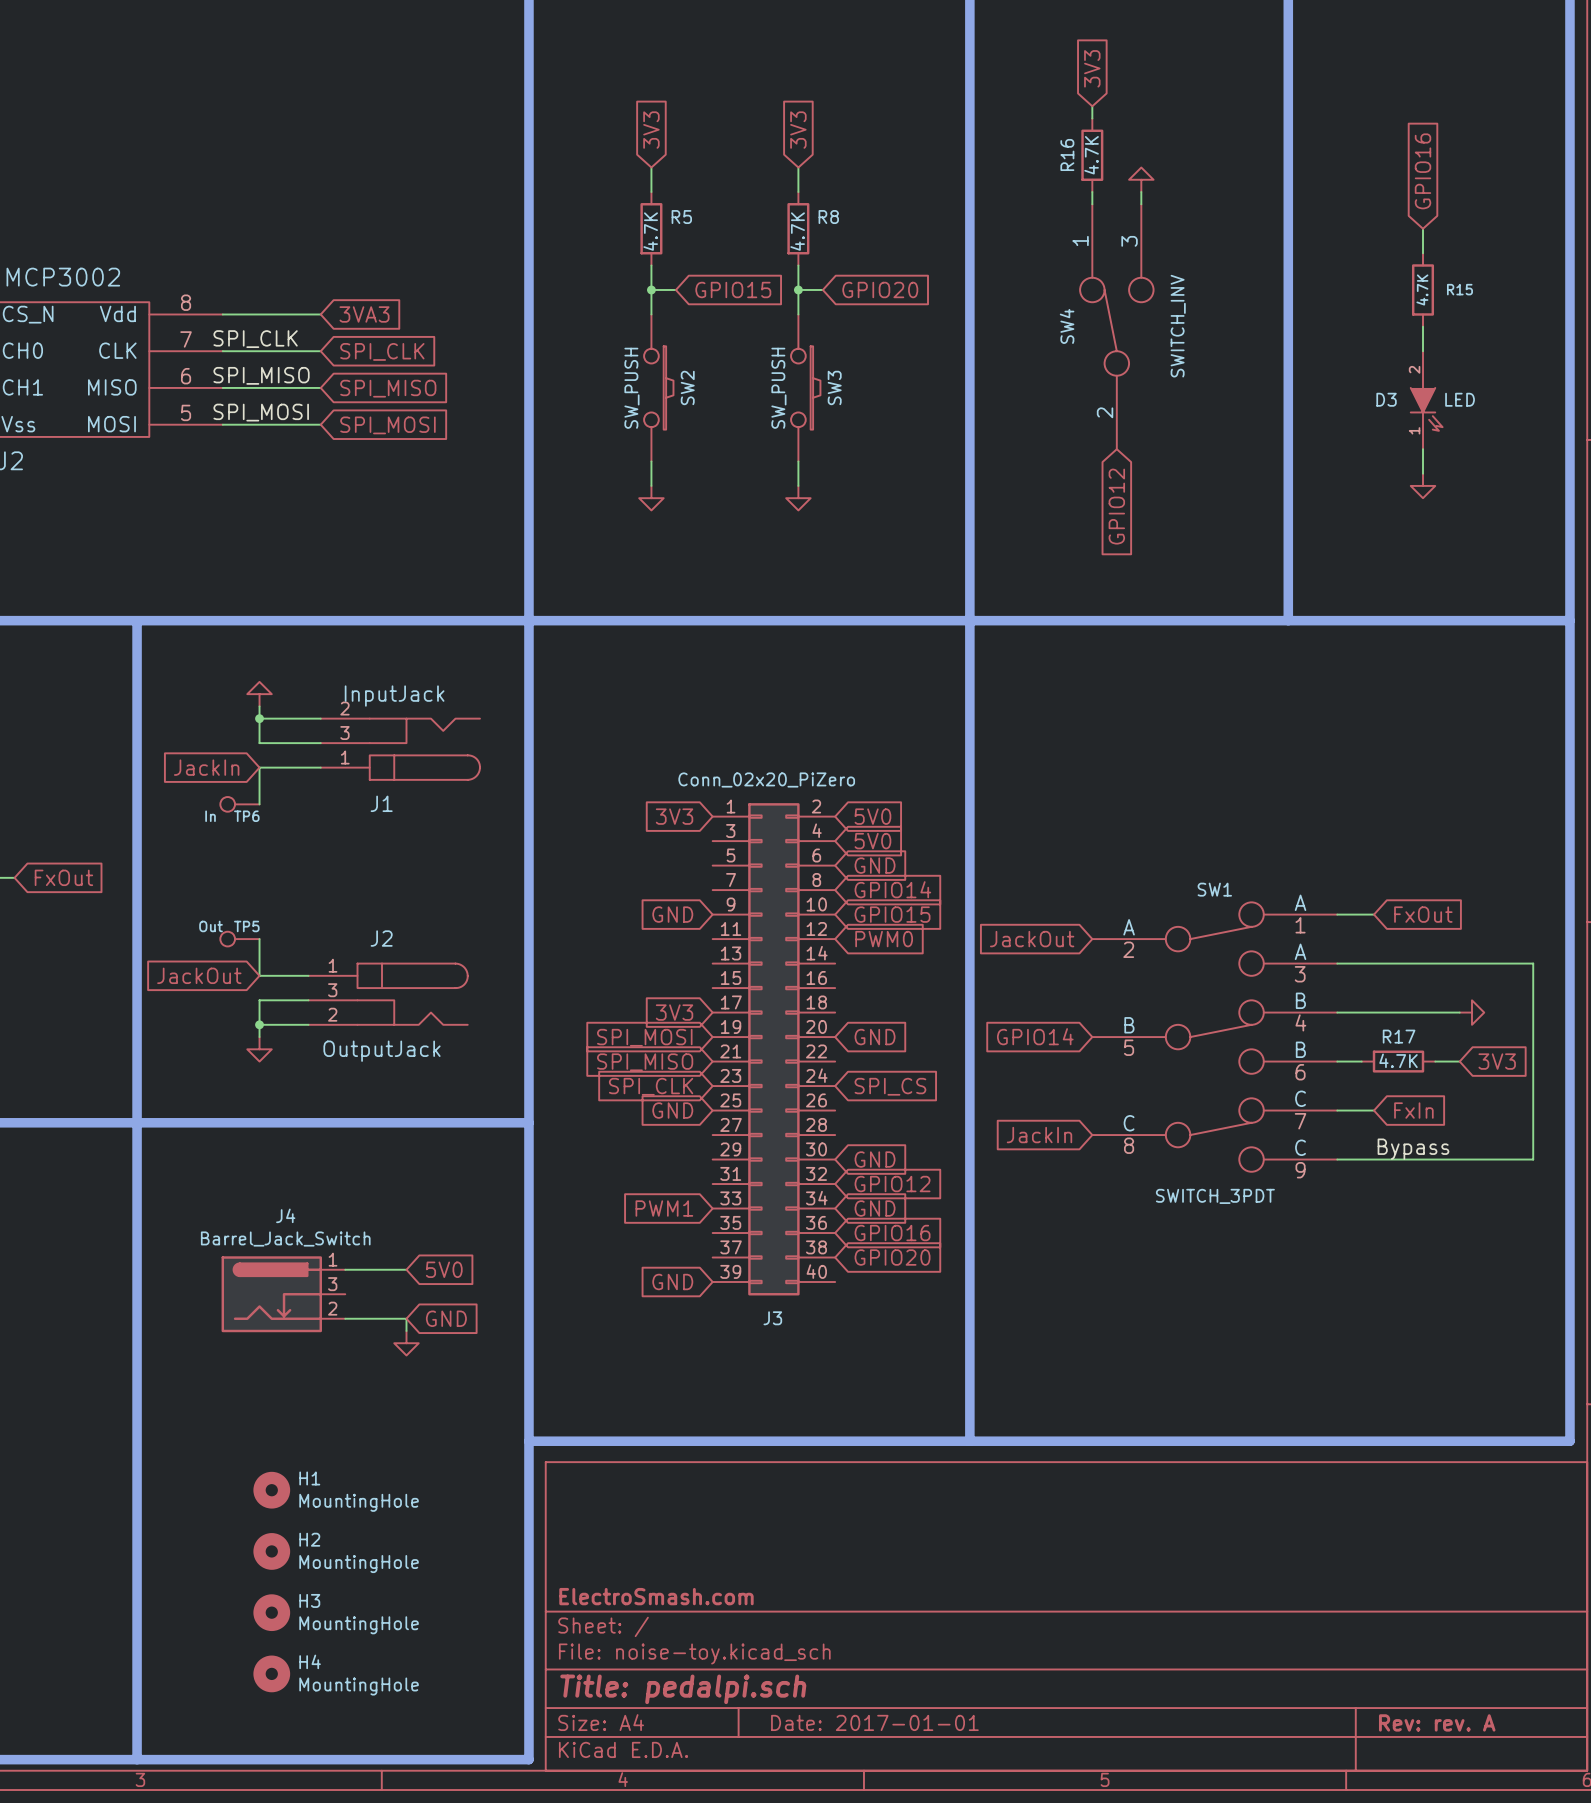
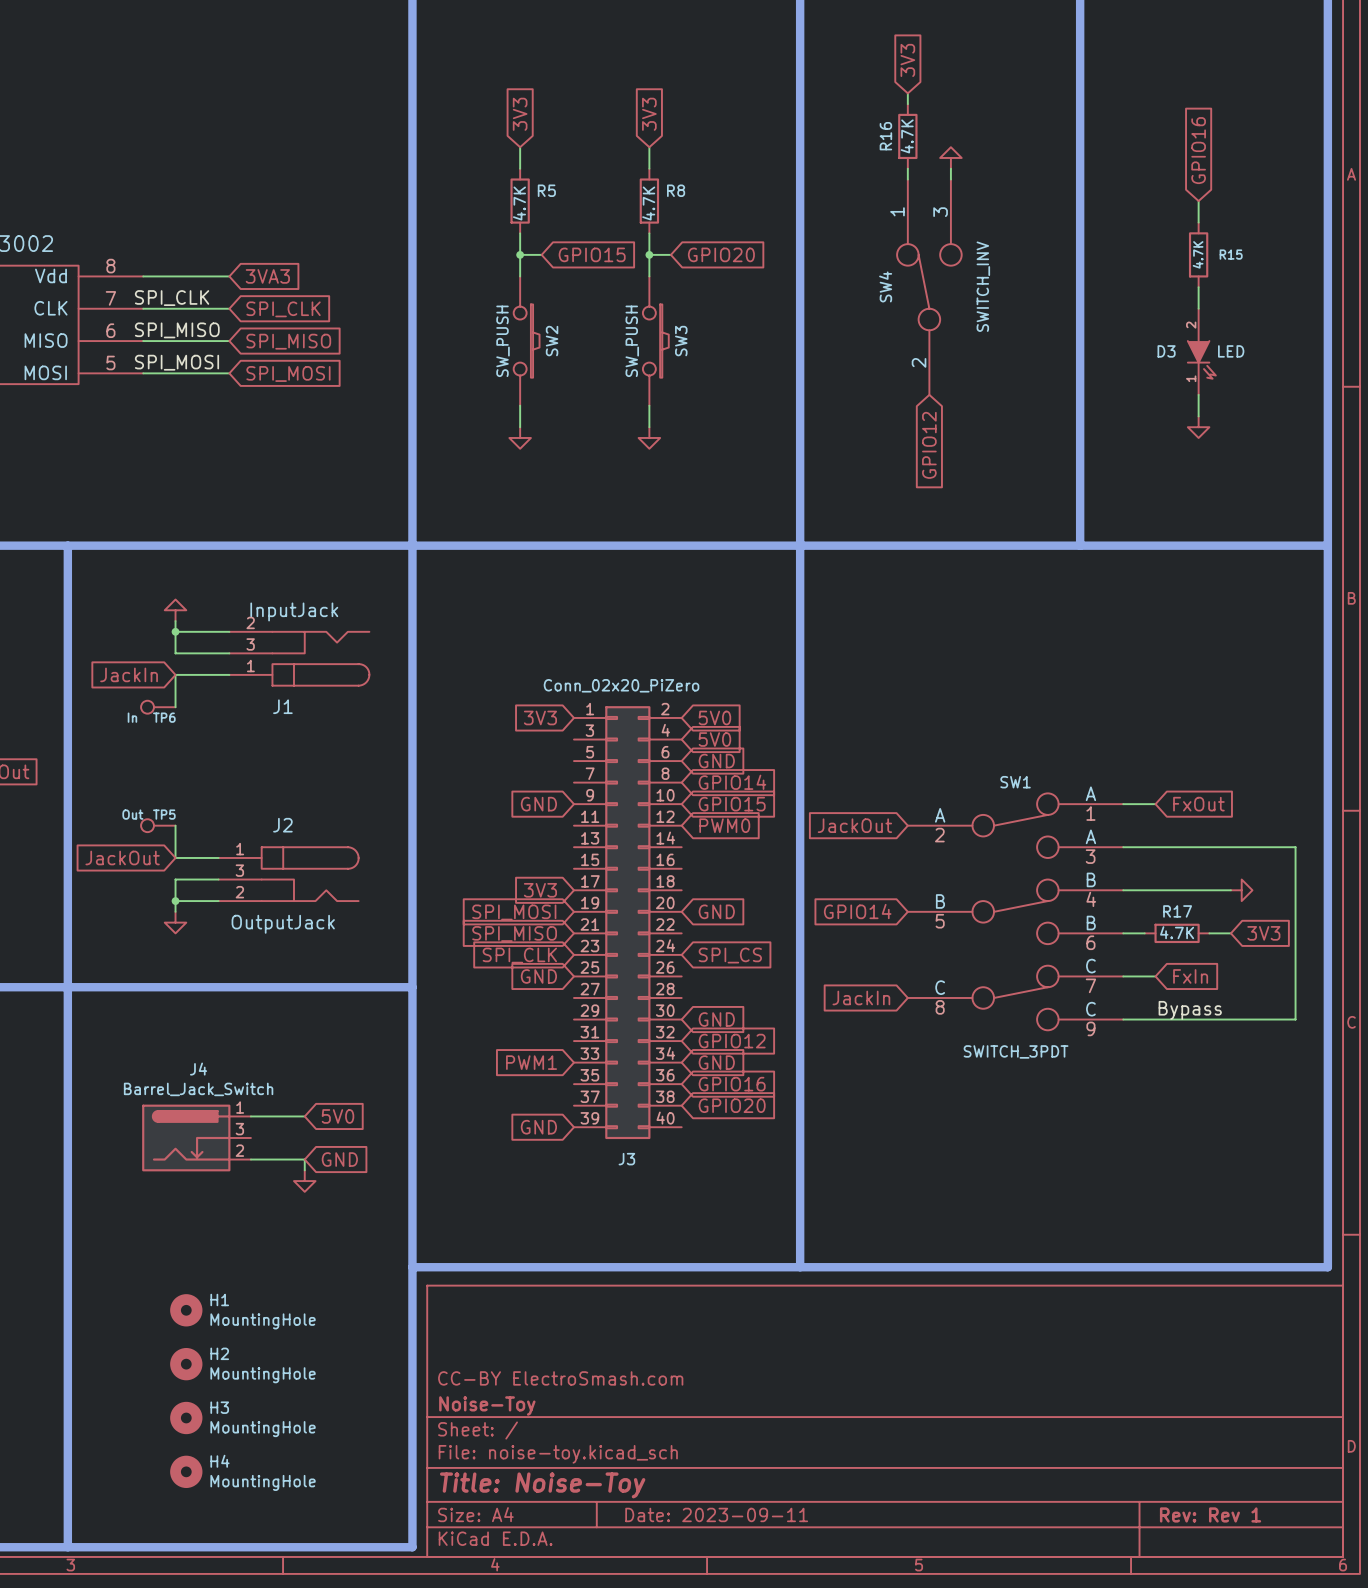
title block: none -> CC-BY ElectroSmash.com (560, 1378)
title block: ElectroSmash.com (656, 1596) -> Noise-Toy (487, 1405)
title block: Title: pedalpi.sch (683, 1689) -> Title: Noise-Toy (542, 1485)
title block: Date: 2017-01-01 (874, 1722) -> Date: 2023-09-11 (716, 1514)
title block: Rev: rev. A (1437, 1722) -> Rev: Rev 1 (1210, 1514)

